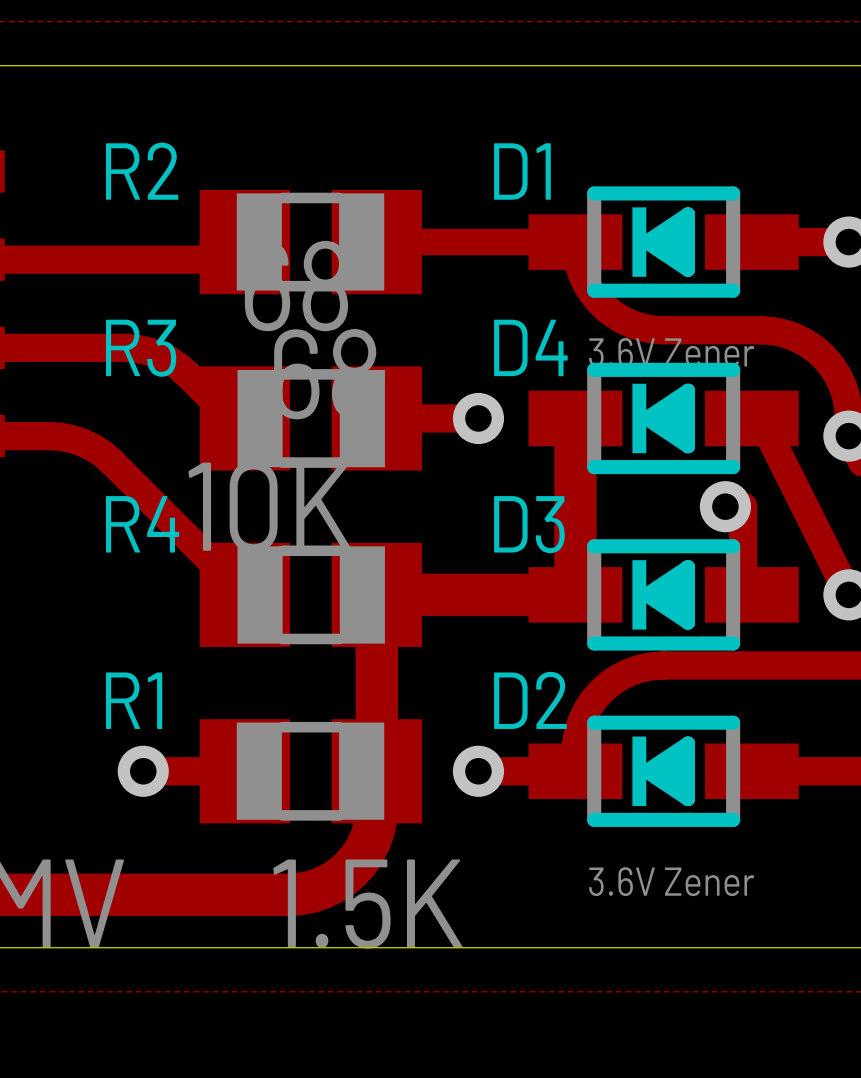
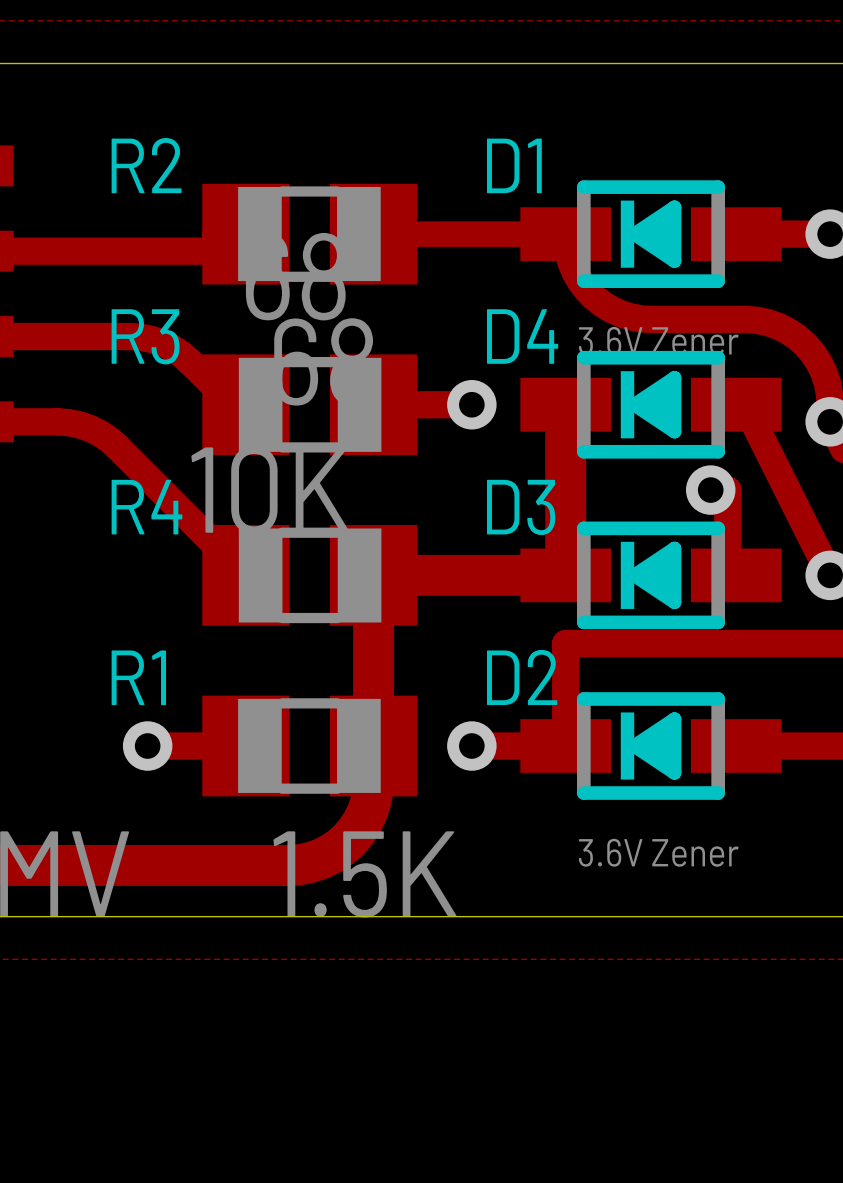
track: (663, 665) (640, 668) (629, 672) (609, 683) (601, 691) (593, 699) (582, 719) (578, 730) (575, 753) -> (651, 643) (565, 643) (565, 728)

